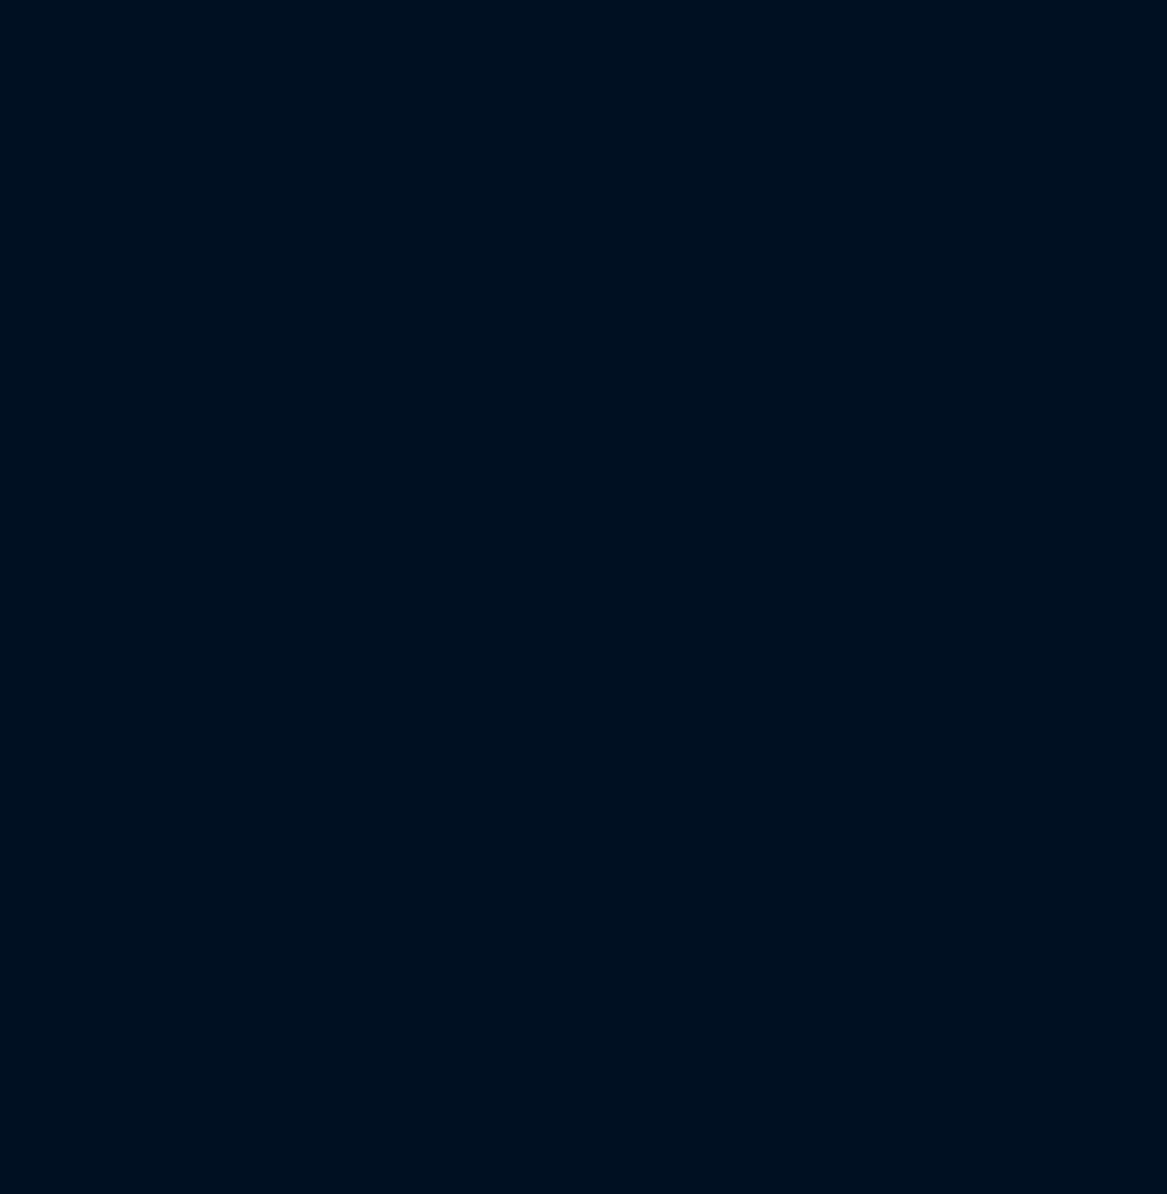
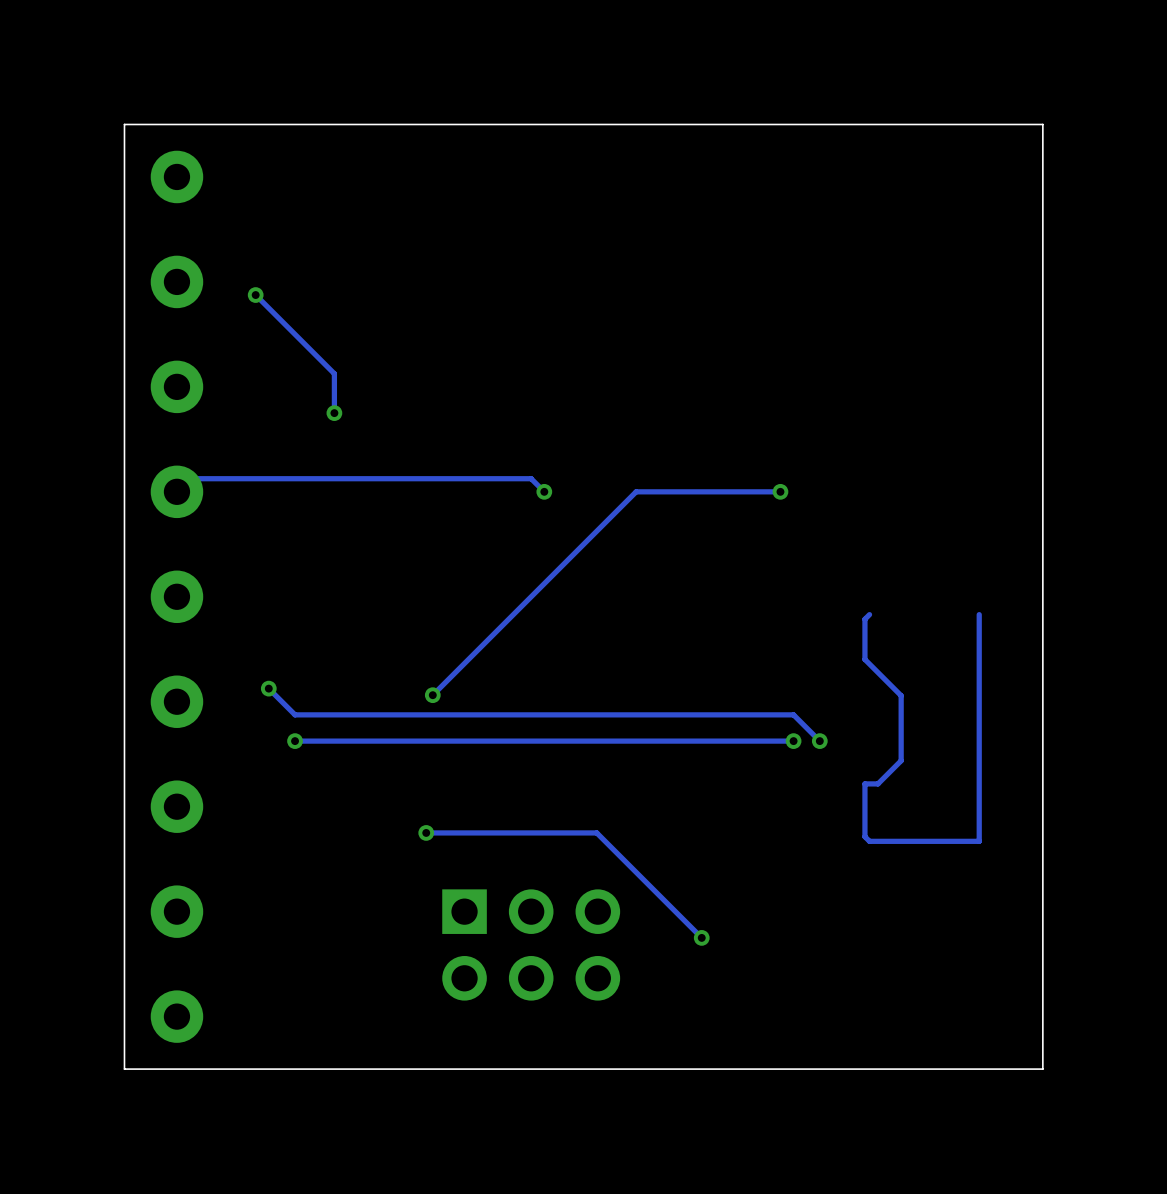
board edge: none -> (1042, 124) (124, 124) (124, 1069) (1042, 1069) (1042, 124)
track: none -> (255, 295) (334, 373) (334, 413)
via: none -> (255, 295)
via: none -> (334, 413)
track: none -> (544, 491) (531, 478) (190, 478) (176, 491)
via: none -> (544, 491)
track: none -> (780, 491) (636, 491) (432, 695)
via: none -> (780, 491)
part: none -> (176, 596)
track: none -> (979, 614) (979, 841) (869, 841) (864, 836) (864, 783) (877, 783) (901, 760) (901, 695) (864, 659) (864, 619) (869, 614)
track: none -> (268, 688) (295, 714) (793, 714) (819, 741)
via: none -> (268, 688)
via: none -> (432, 695)
via: none -> (295, 741)
track: none -> (793, 741) (295, 741)
via: none -> (793, 741)
via: none -> (819, 741)
track: none -> (426, 832) (596, 832) (701, 937)
via: none -> (426, 832)
via: none -> (701, 937)
part: none -> (531, 944)

